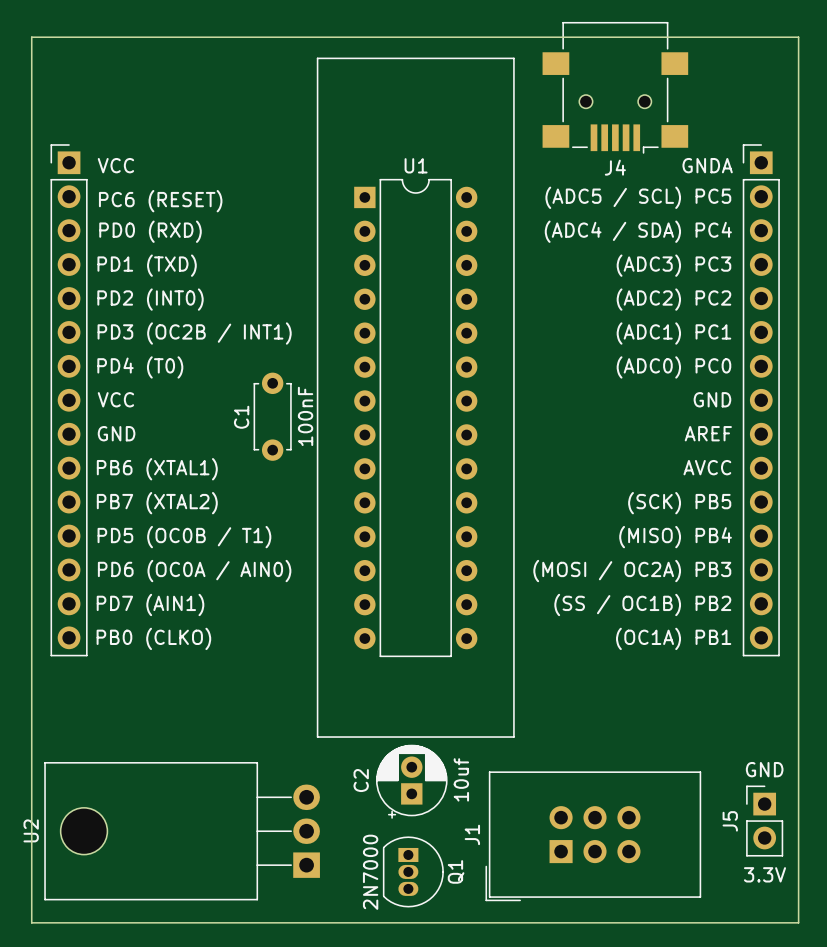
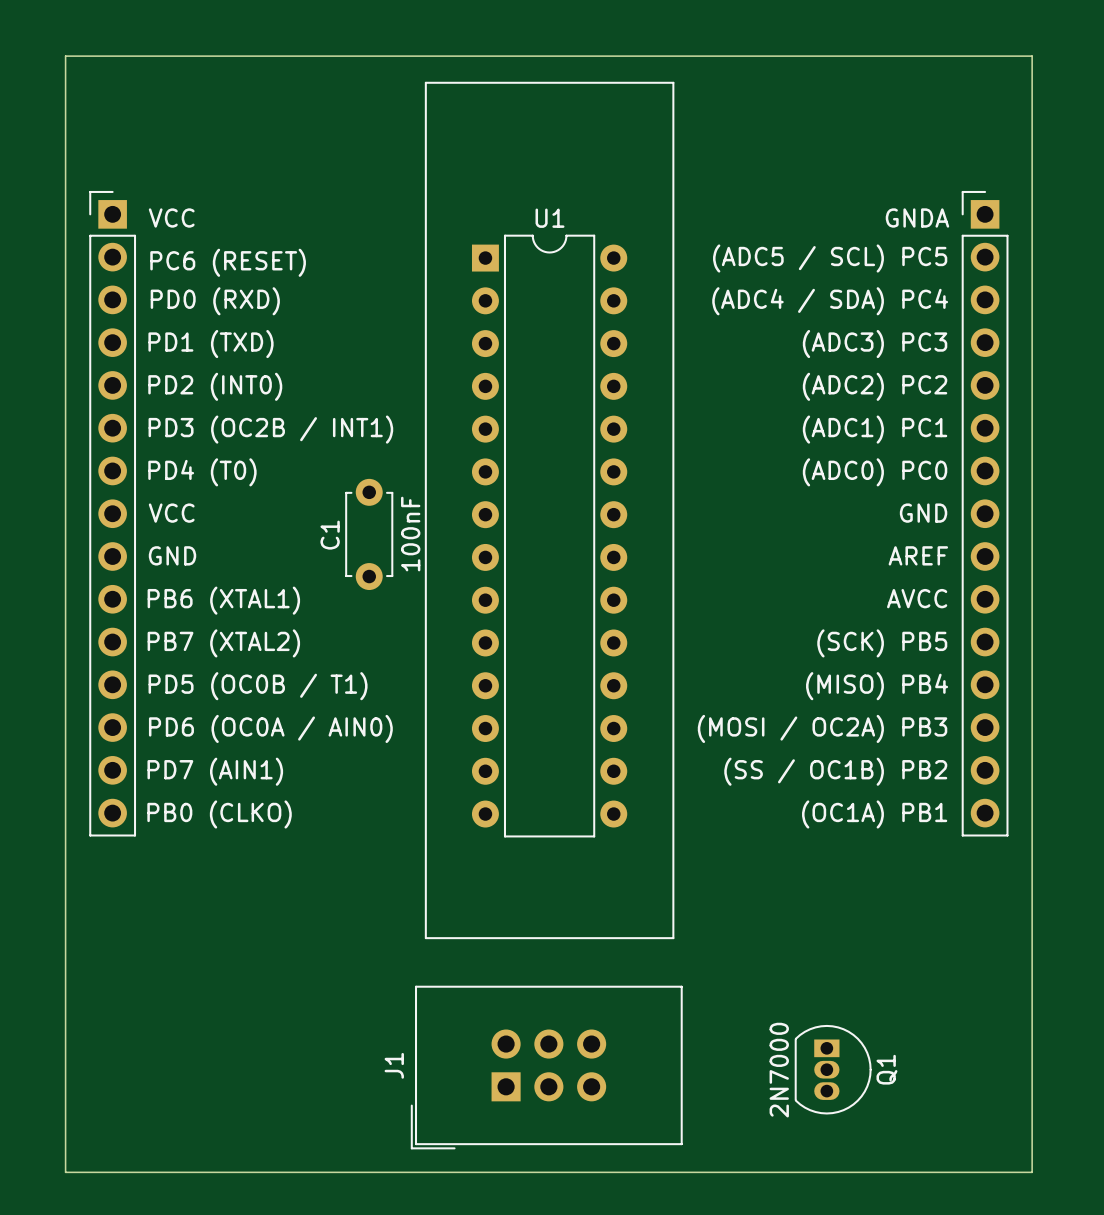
J4: (615, 87) -> none
text: GND (764, 769) -> none
C2: 10uf (411, 781) -> none
J5: (764, 821) -> none
U2: (182, 831) -> none
J1 position: (593, 836) -> (546, 1067)
Q1 position: (413, 871) -> (833, 1069)
text: 3.3V (764, 874) -> none

